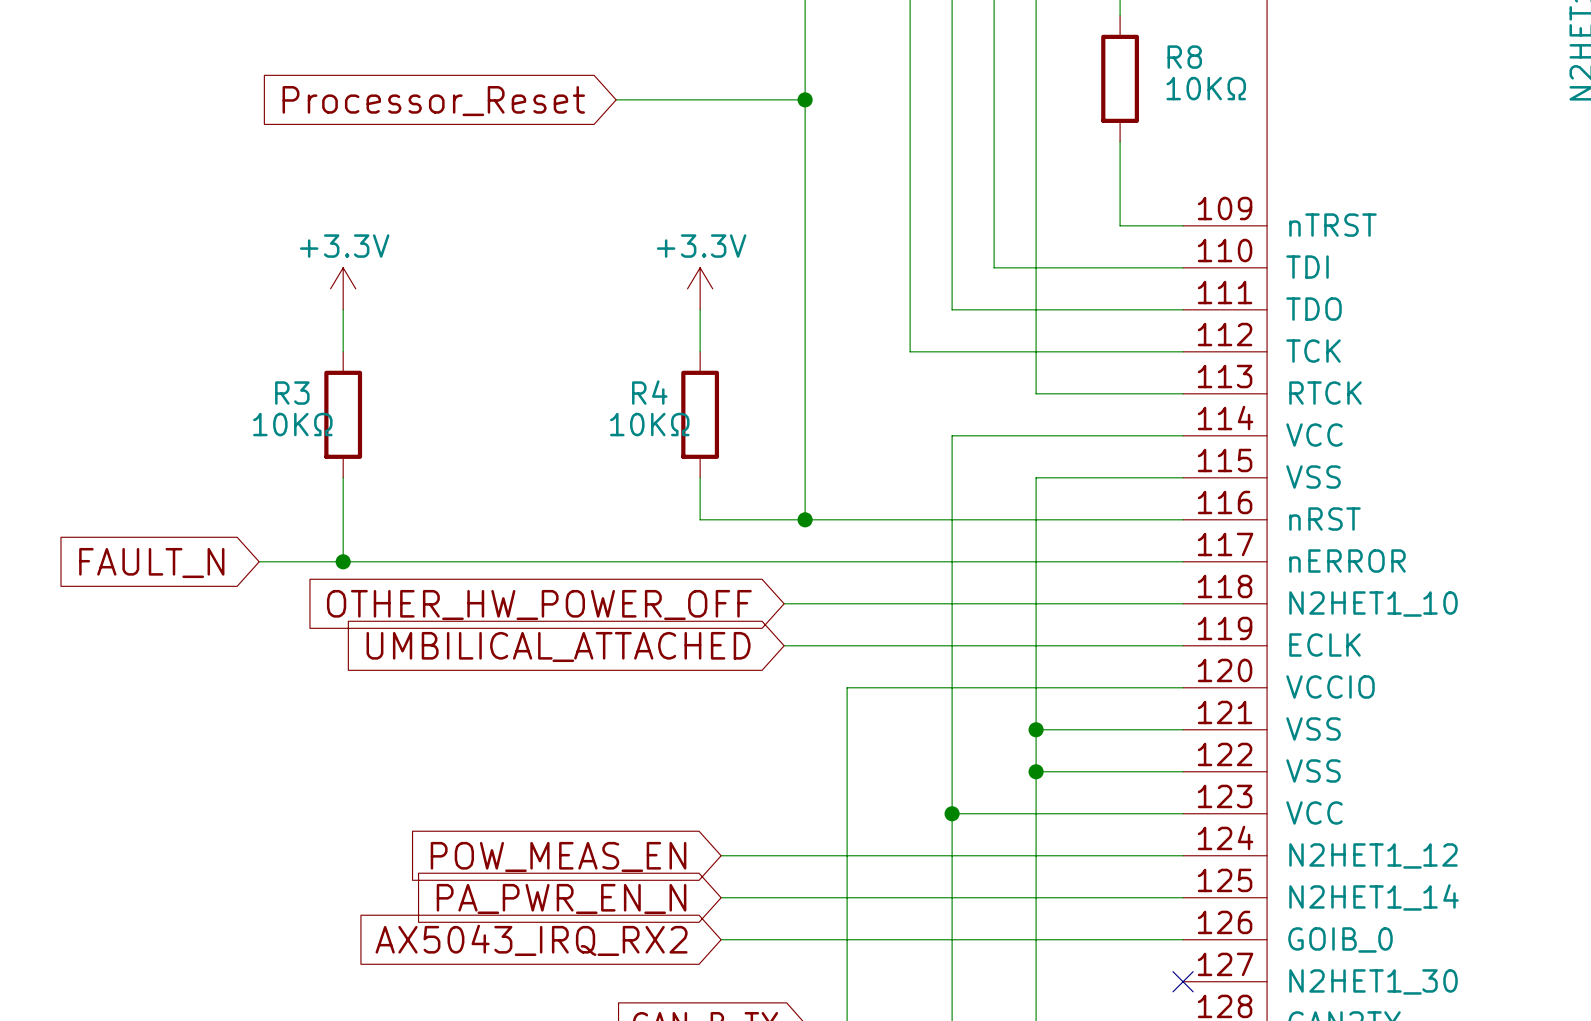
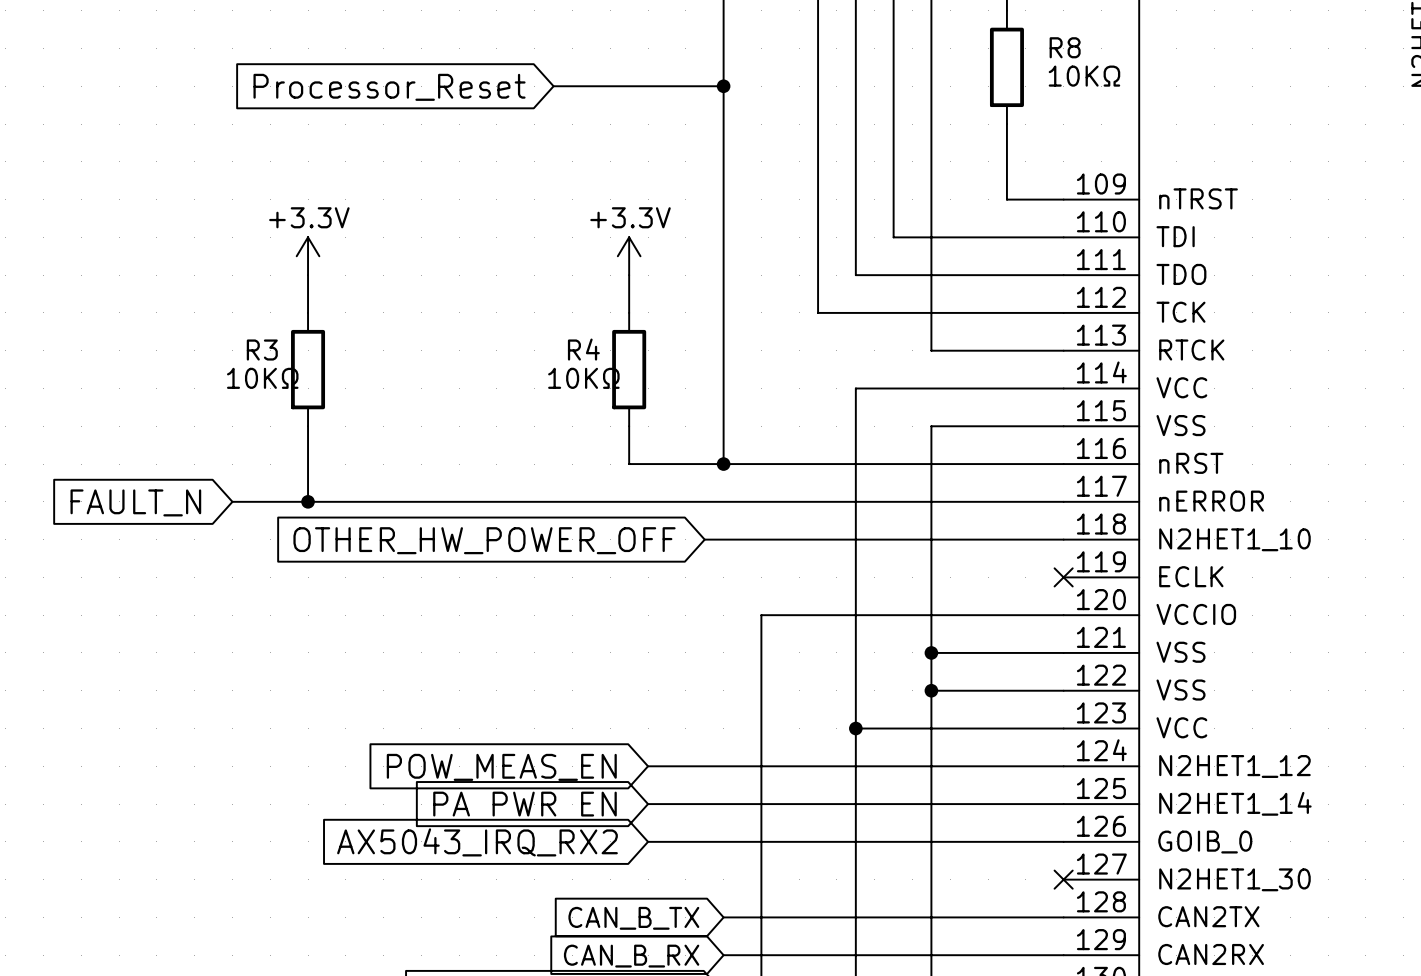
wire: (784, 645) (1183, 645) -> none
no-connect mark: none -> (1063, 577)
global label: UMBILICAL_ATTACHED (558, 646) -> none
global label: PA_PWR_EN_N (561, 898) -> PA PWR EN (524, 804)

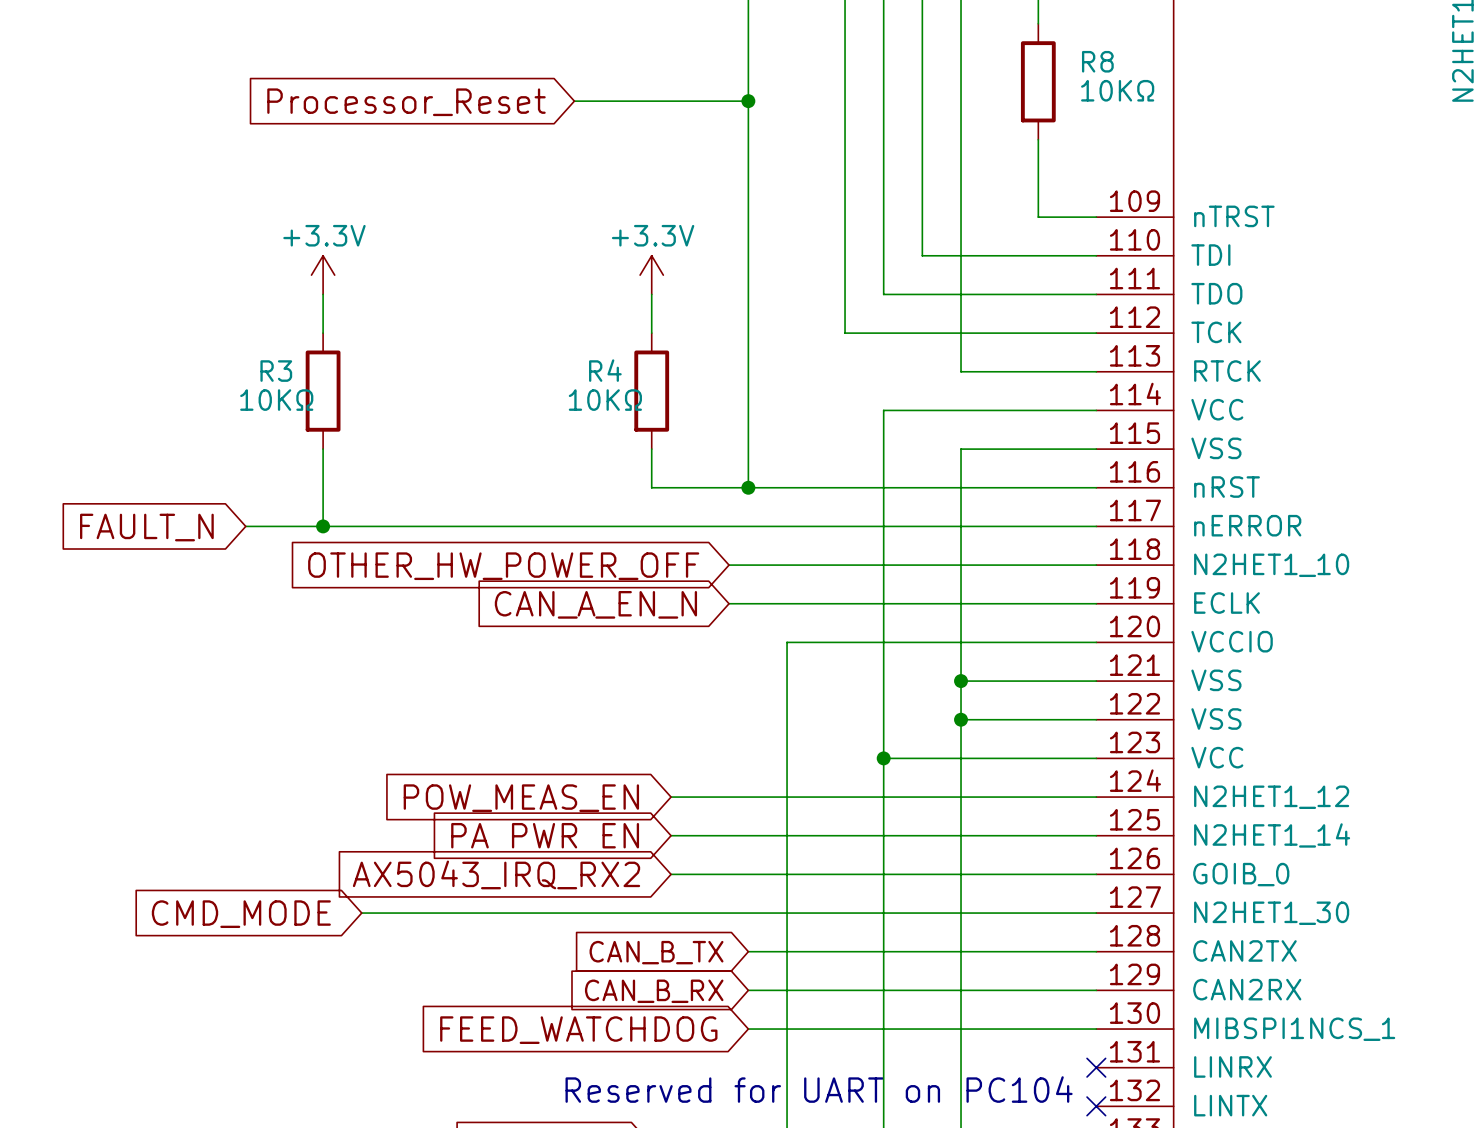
wire: none -> (729, 603) (1096, 603)
no-connect mark: (1063, 577) -> none
global label: none -> CAN_A_EN_N (595, 604)
wire: none -> (361, 913) (1096, 913)
no-connect mark: (1063, 879) -> none
global label: none -> CMD_MODE (241, 914)

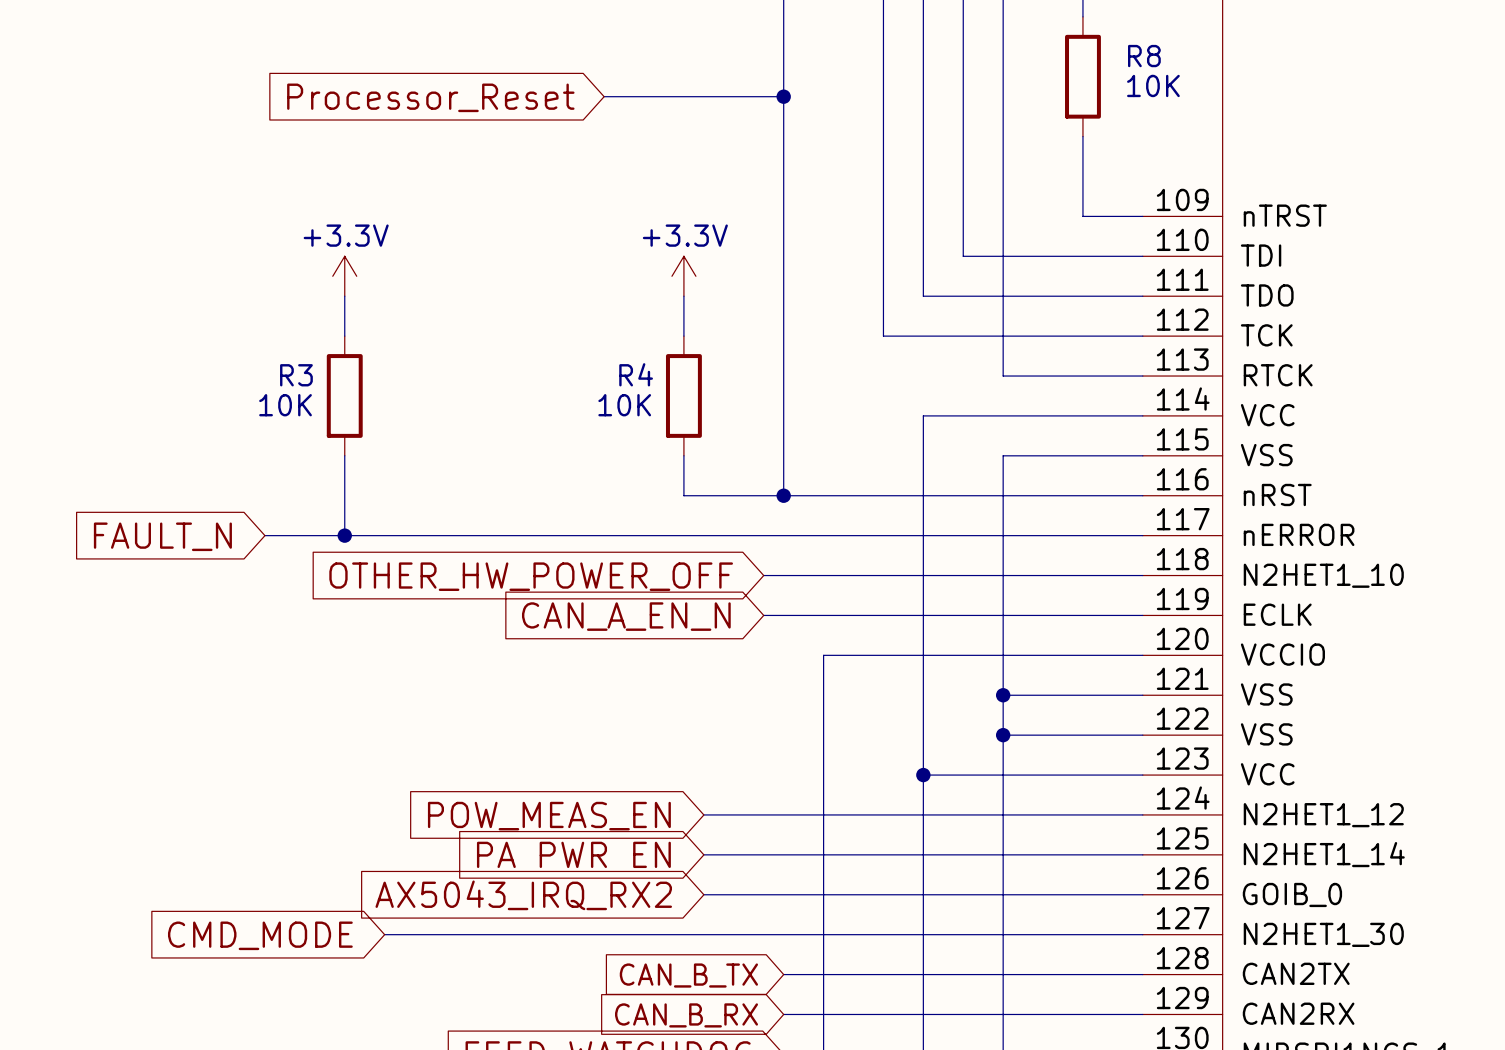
R8 value: 10KΩ (1117, 90) -> 10K (1153, 85)
R3 value: 10KΩ (276, 400) -> 10K (285, 405)
R4 value: 10KΩ (605, 400) -> 10K (624, 405)

